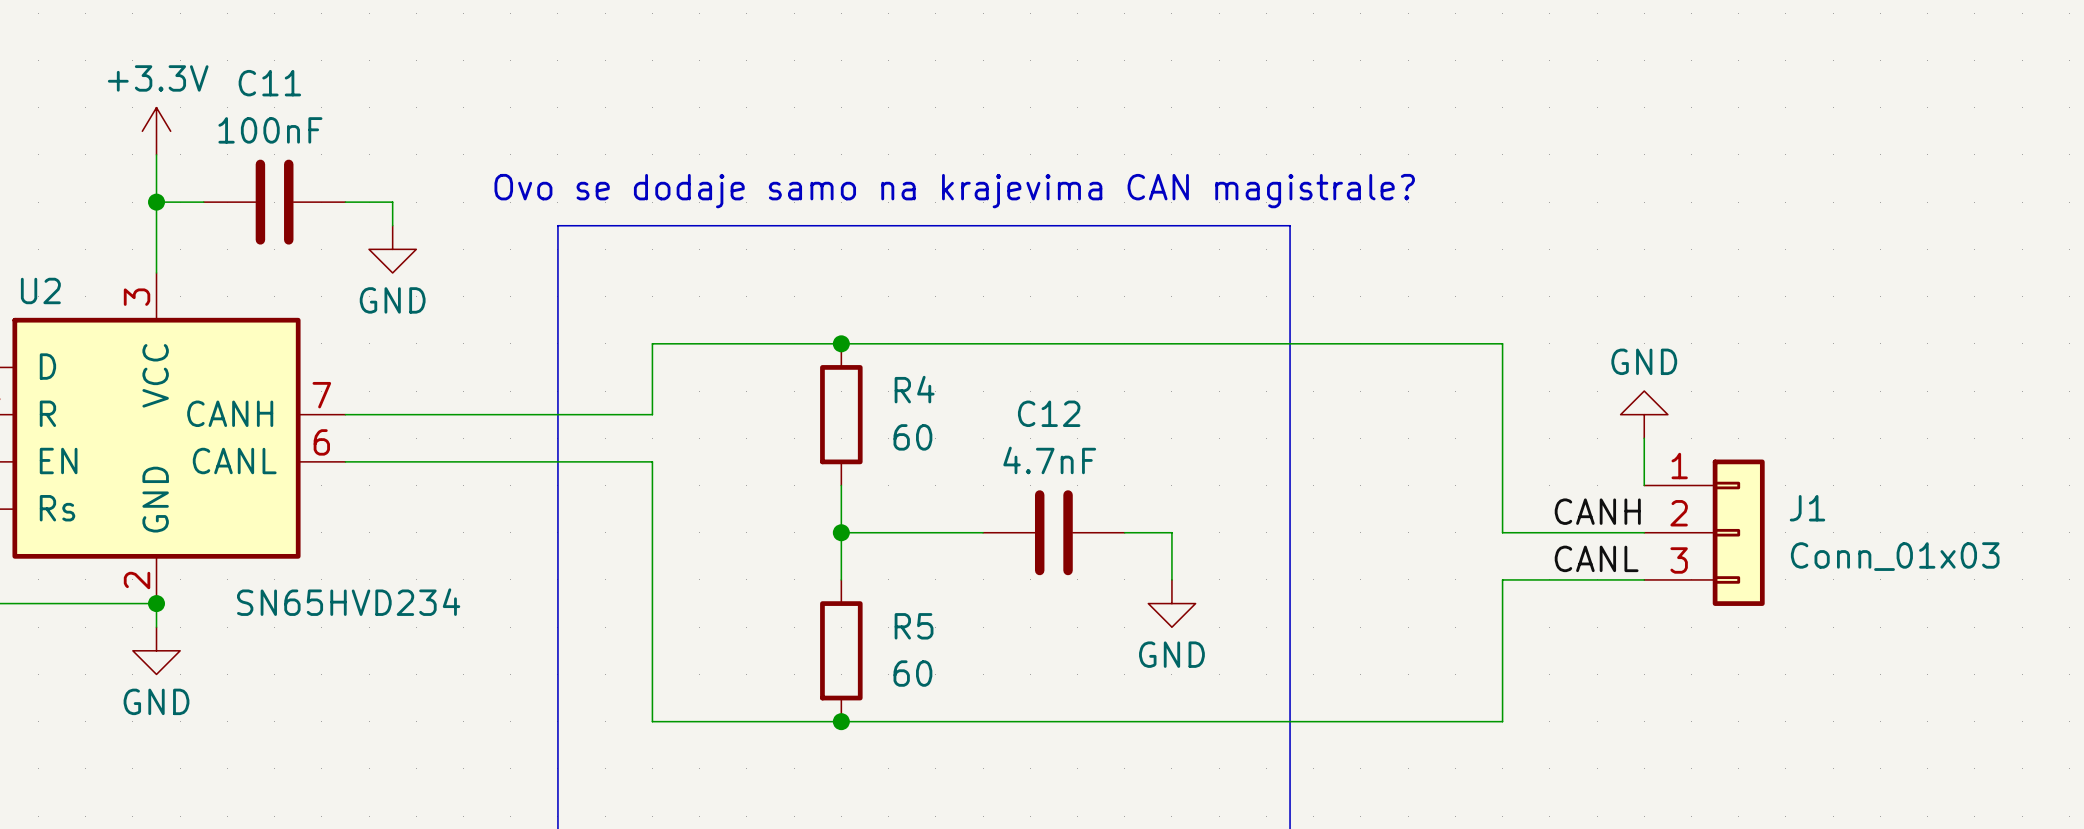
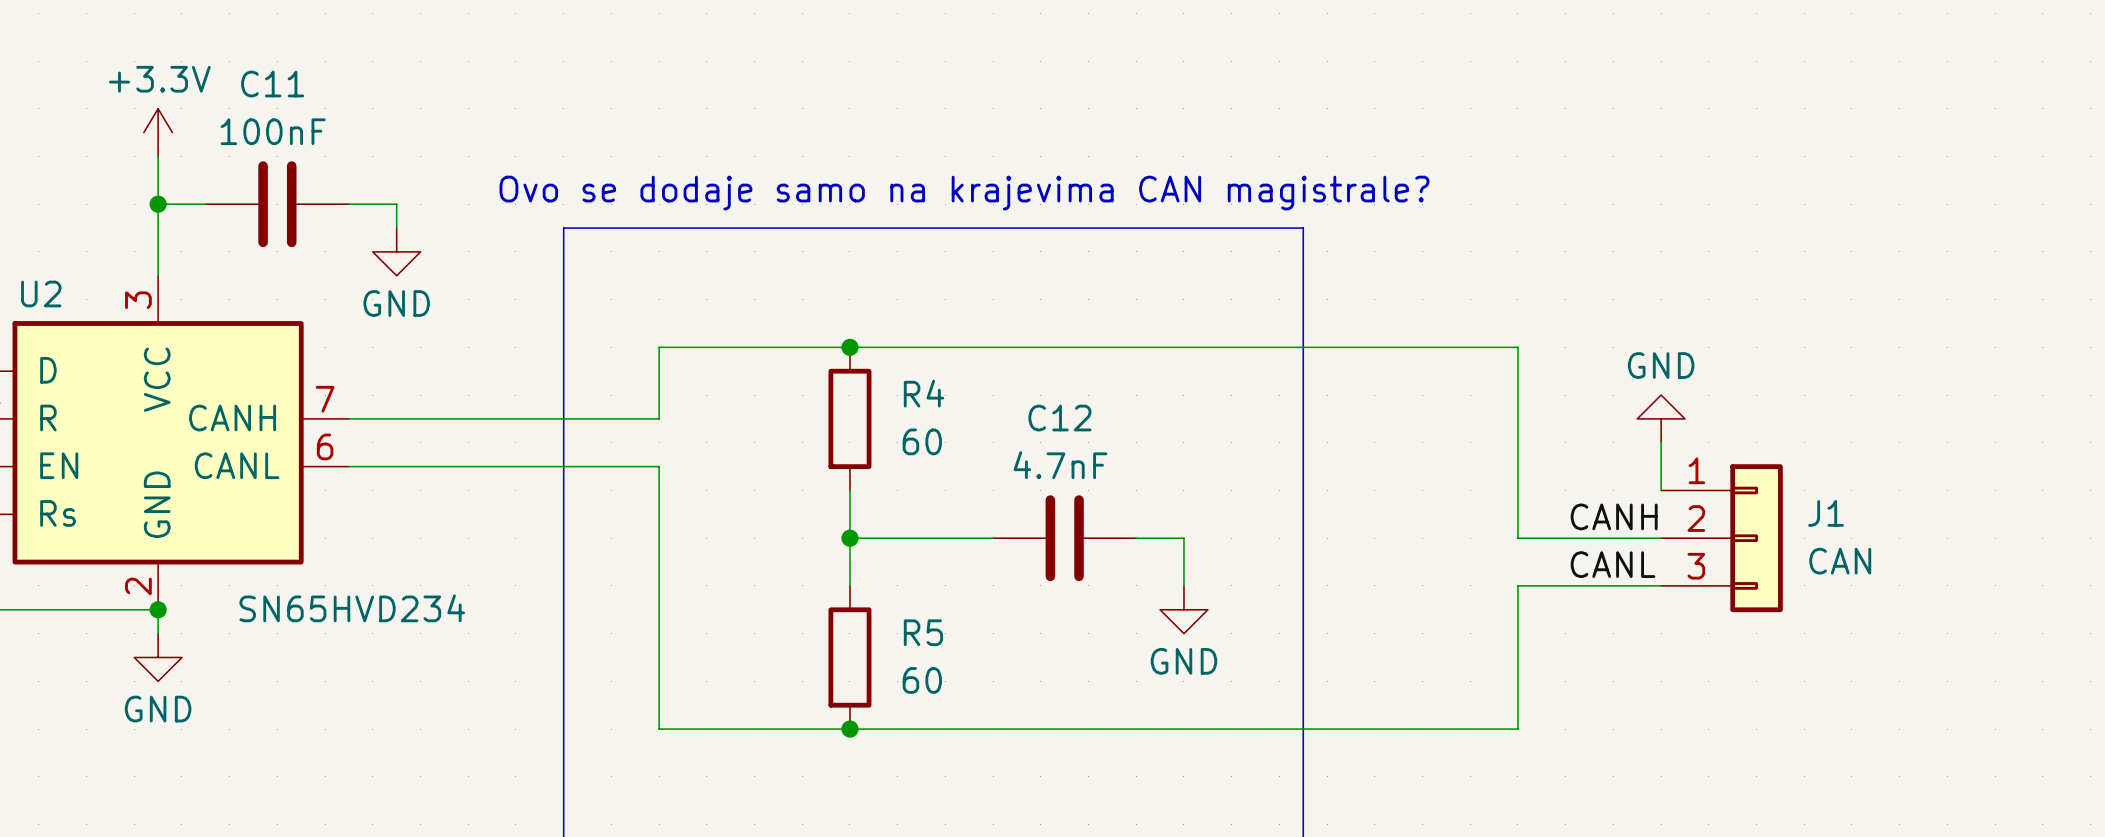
J1 value: Conn_01x03 (1895, 556) -> CAN (1840, 561)

